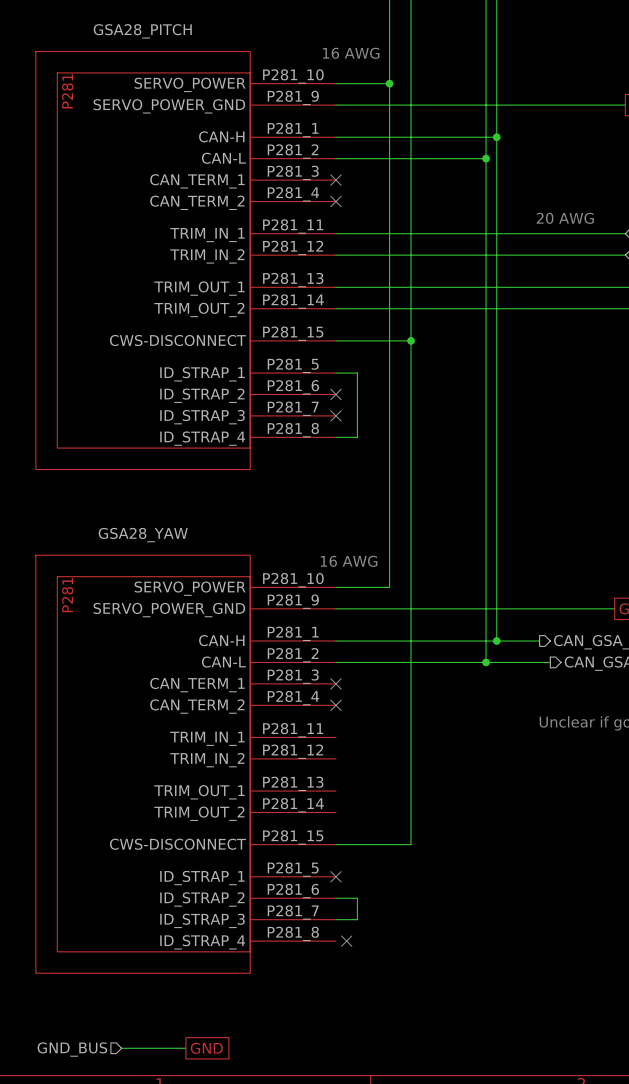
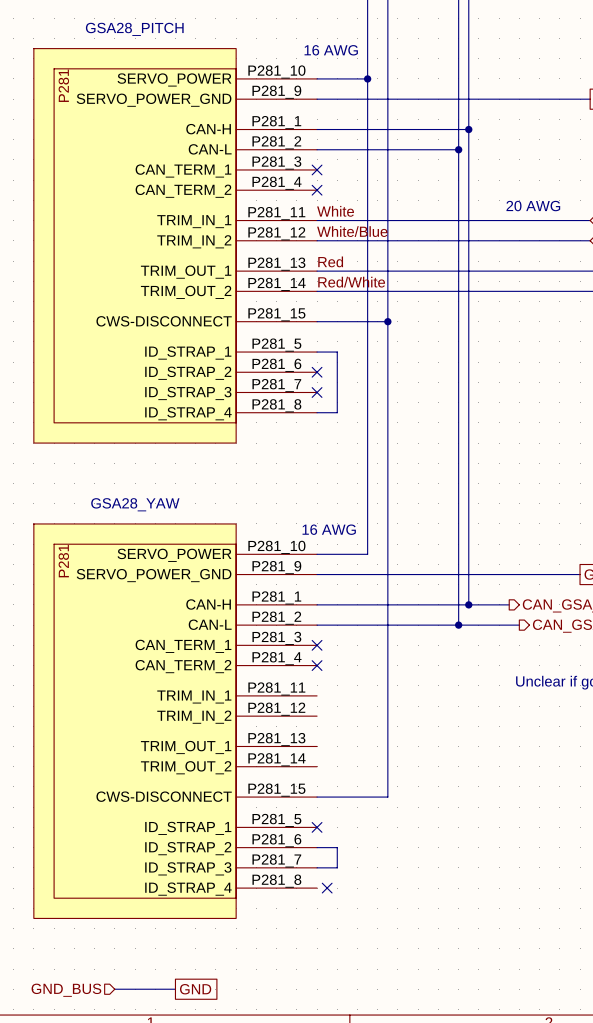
label: none -> White (335, 211)
label: none -> White/Blue (352, 231)
label: none -> Red (330, 261)
label: none -> Red/White (351, 282)

